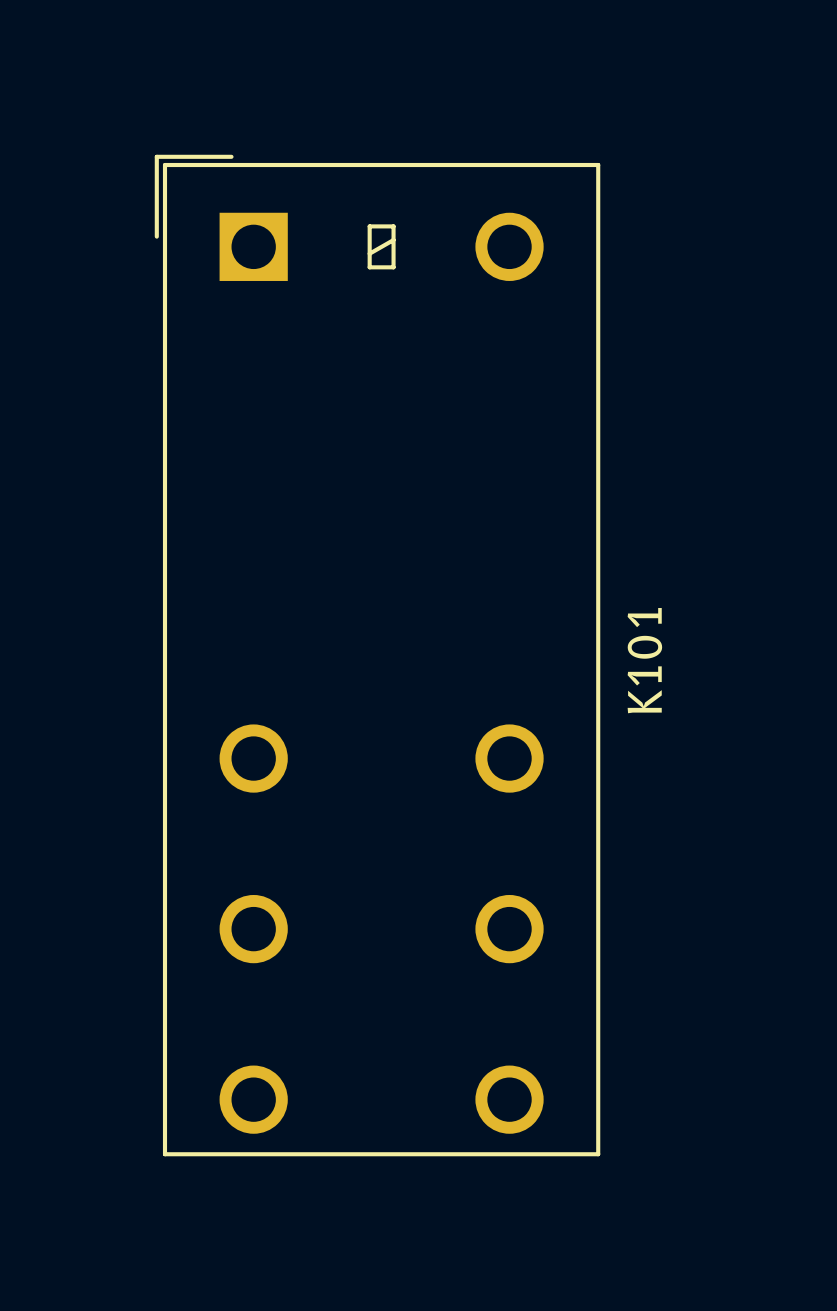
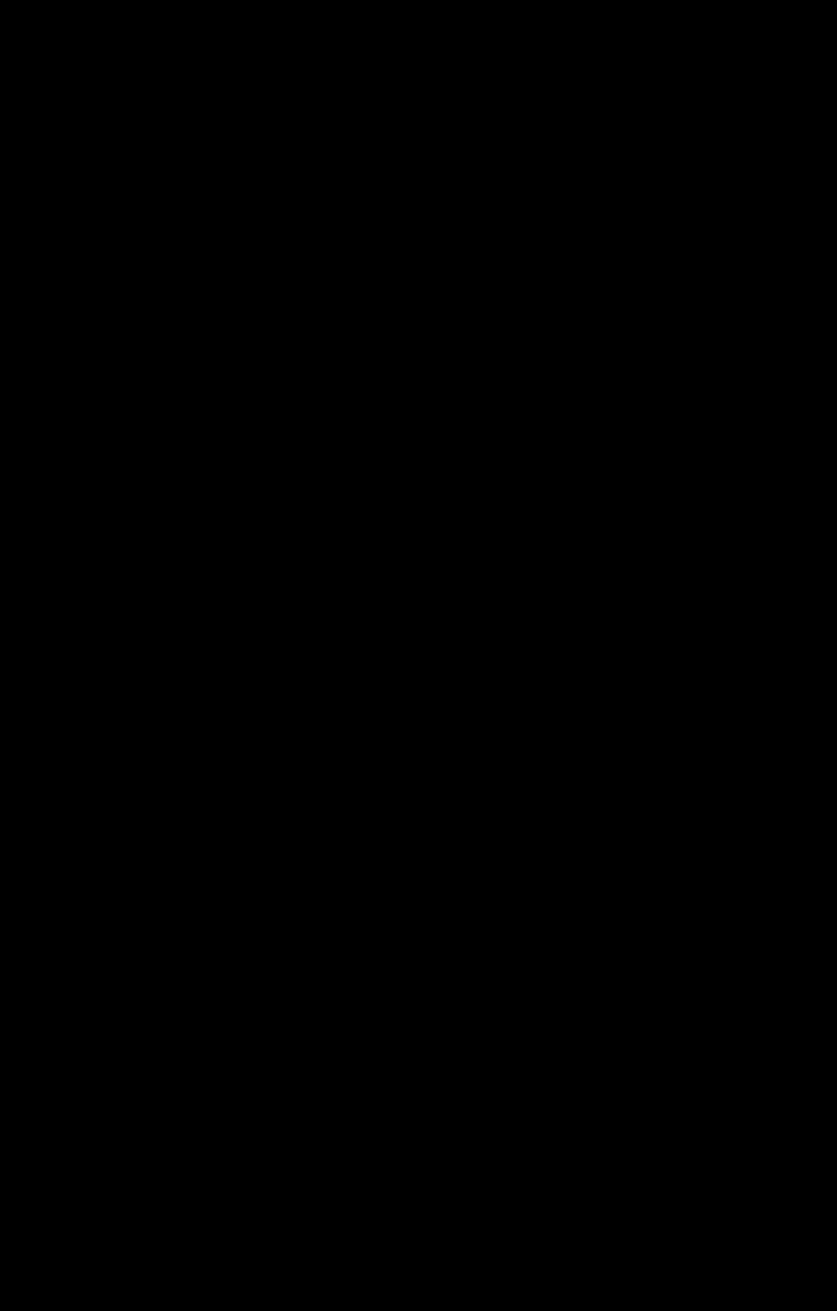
K101: (377, 655) -> none

